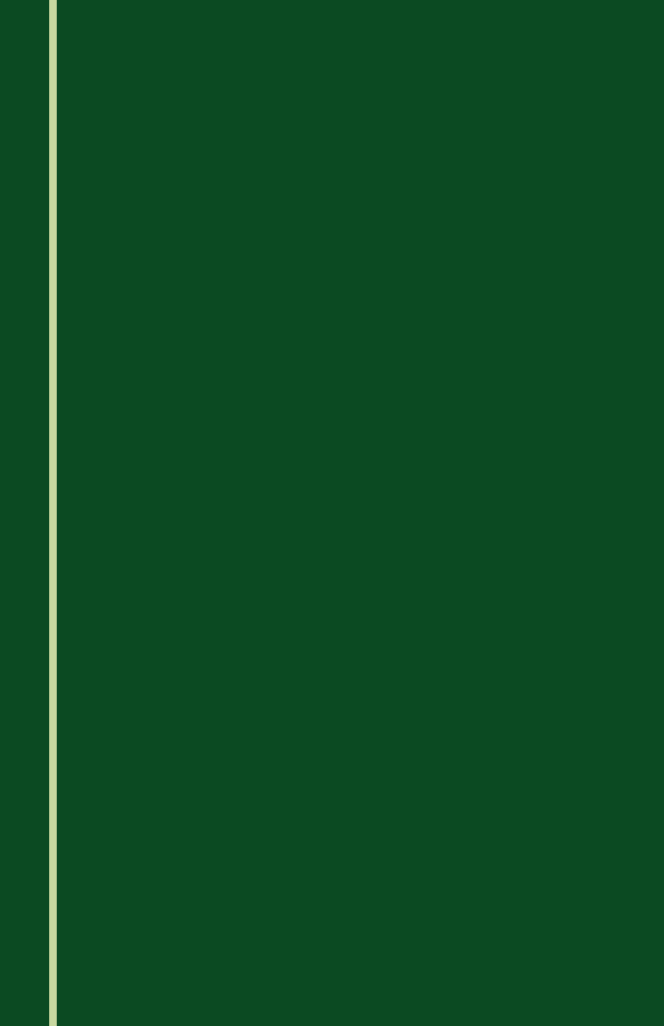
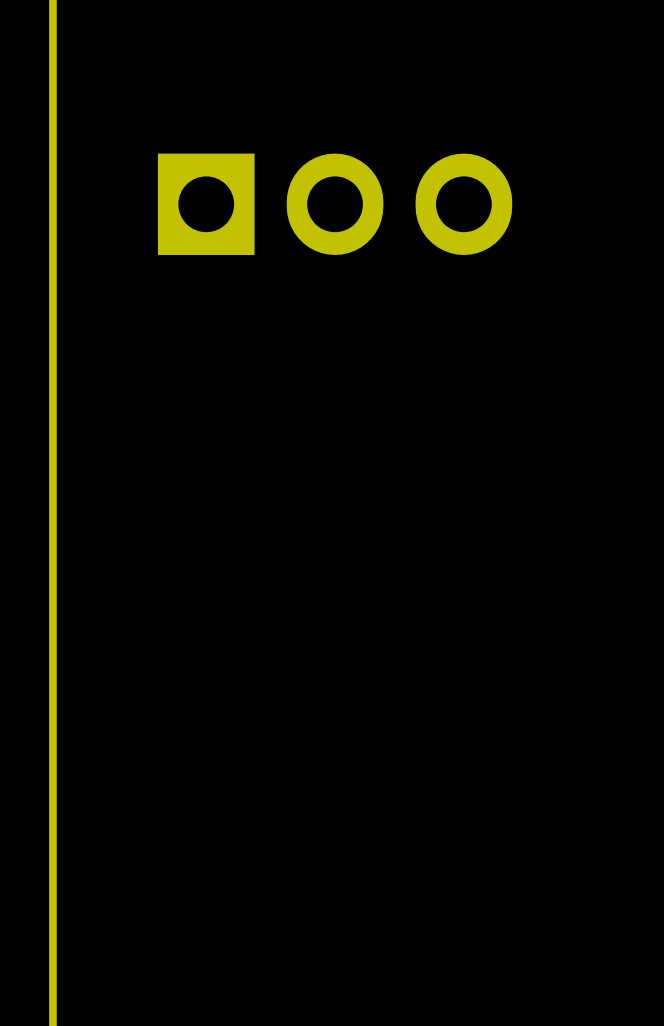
part: none -> (335, 204)

